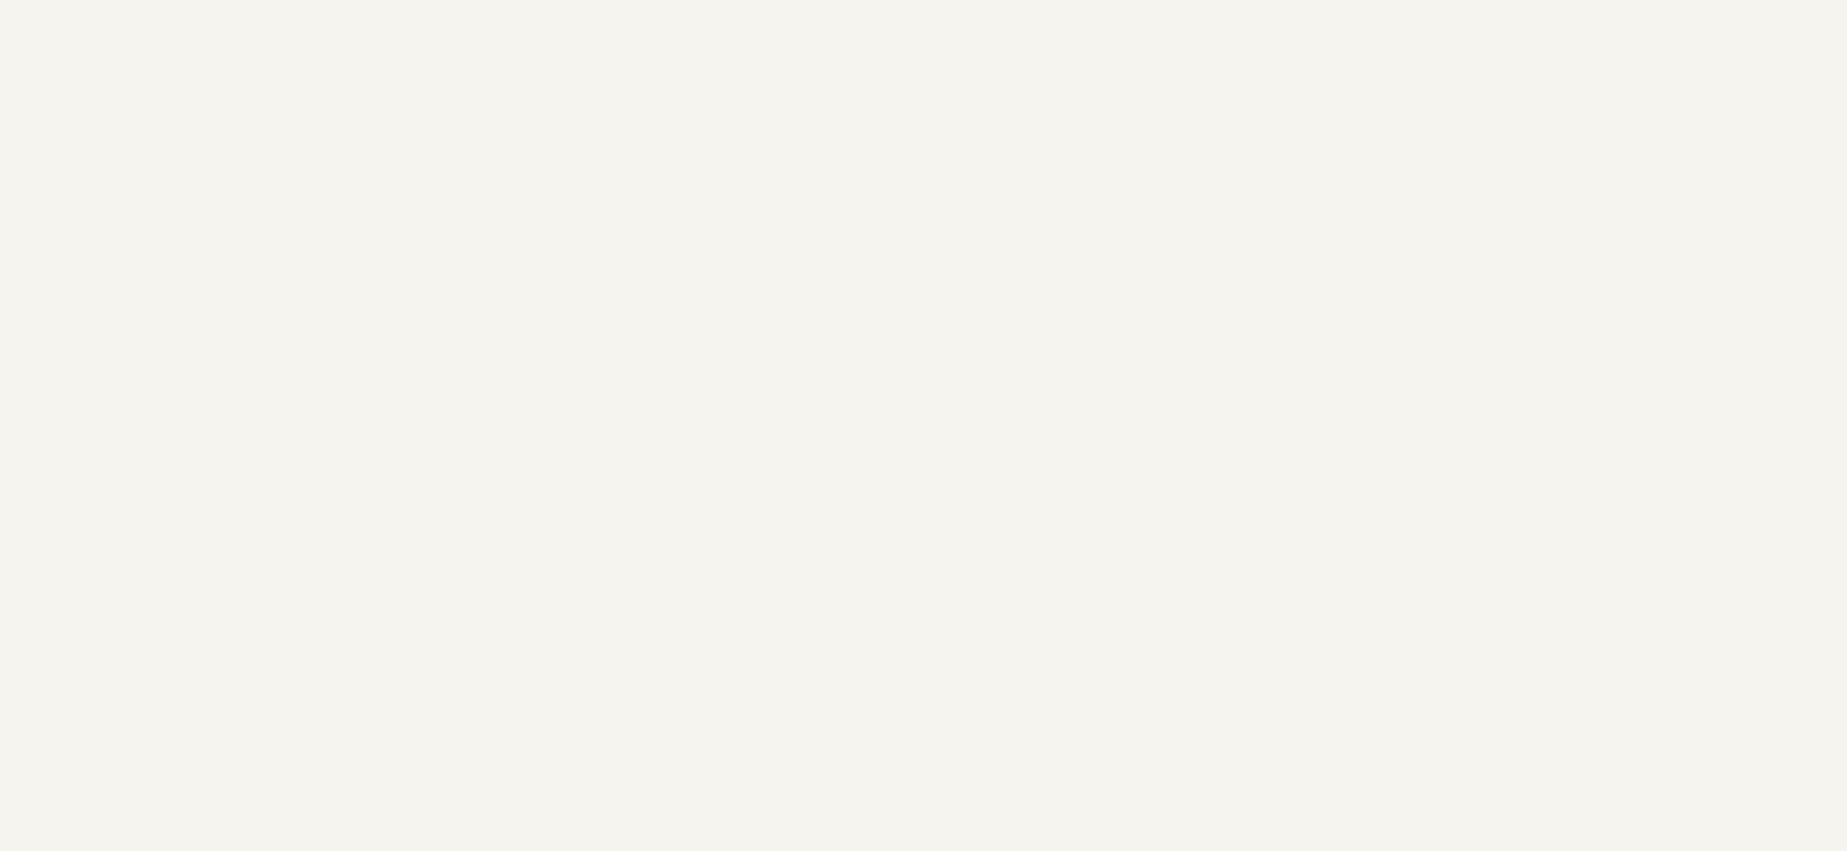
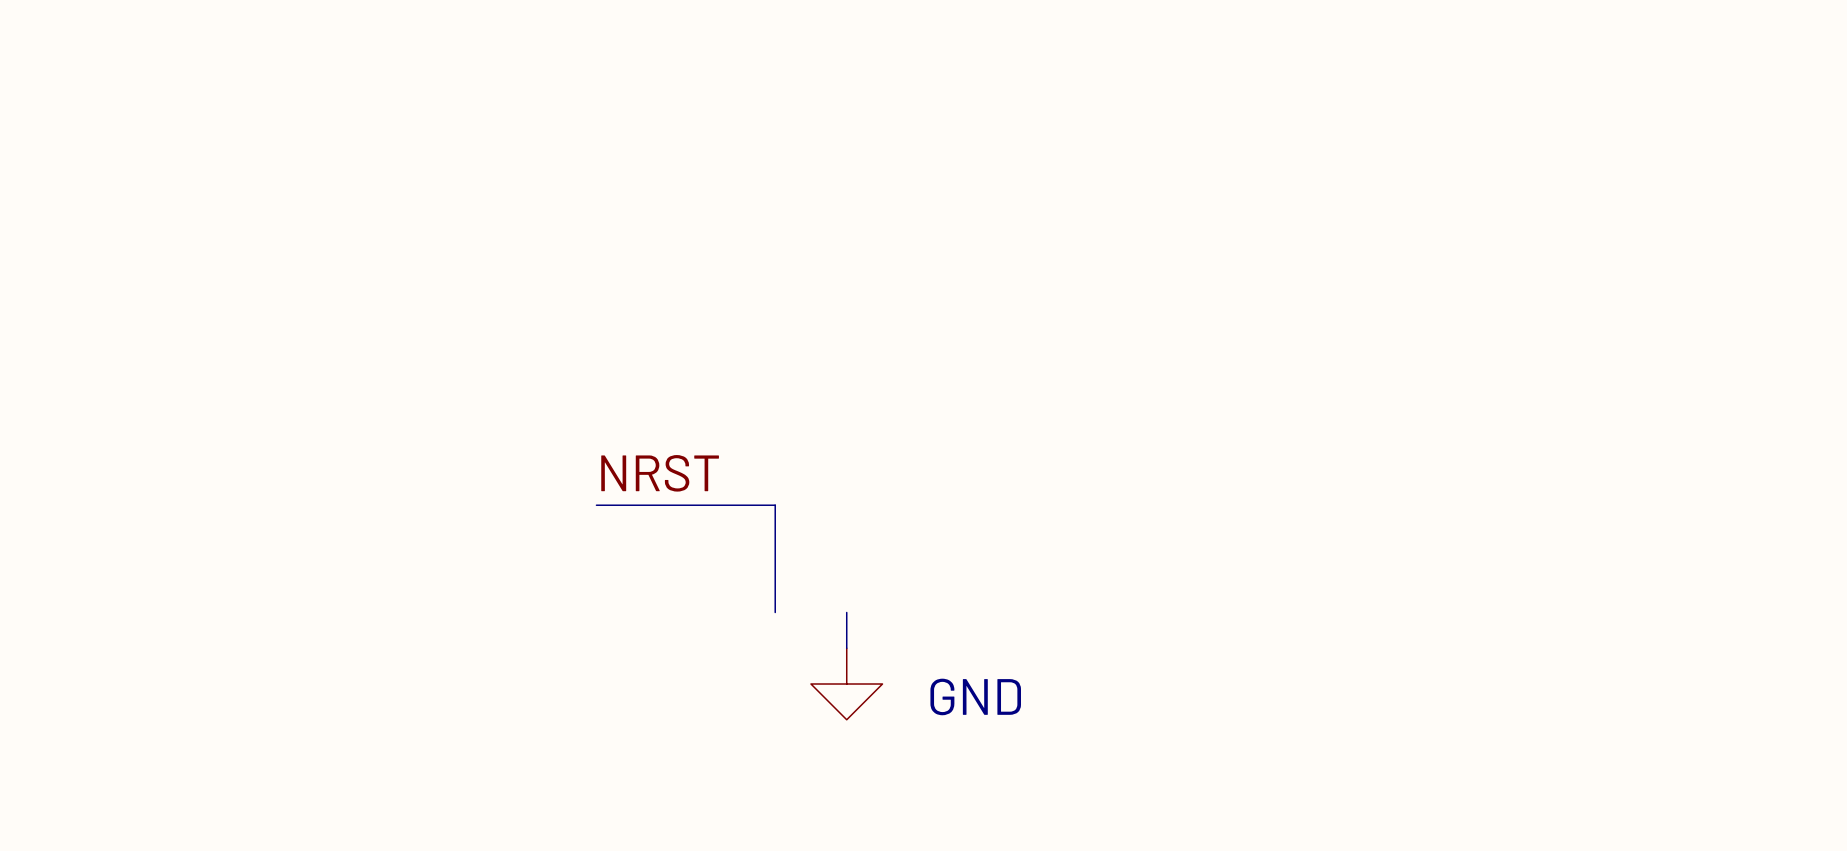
label: none -> NRST (660, 473)
wire: none -> (596, 505) (775, 505) (775, 612)
wire: none -> (846, 612) (846, 648)
power symbol: none -> GND (846, 684)

